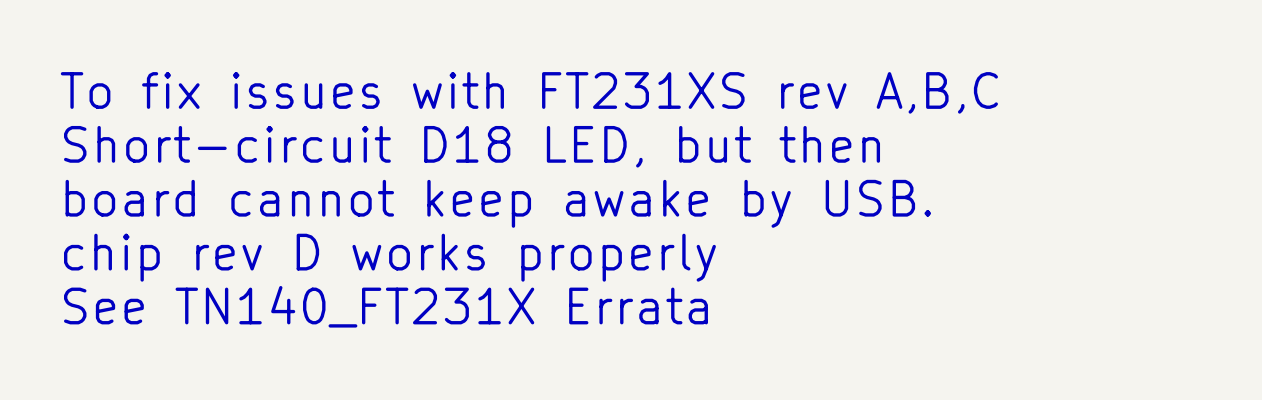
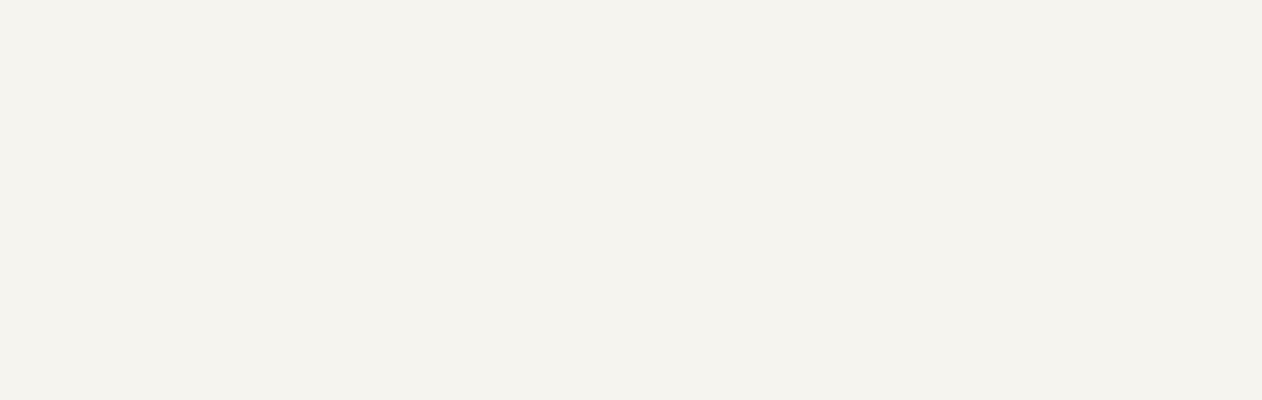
text: To fix issues with FT231XS rev A,B,C (529, 92) -> none
text: Short-circuit D18 LED, but then (472, 146) -> none
text: board cannot keep awake by USB. (498, 203) -> none
text: chip rev D works properly (389, 257) -> none
text: See TN140_FT231X Errata (385, 306) -> none

